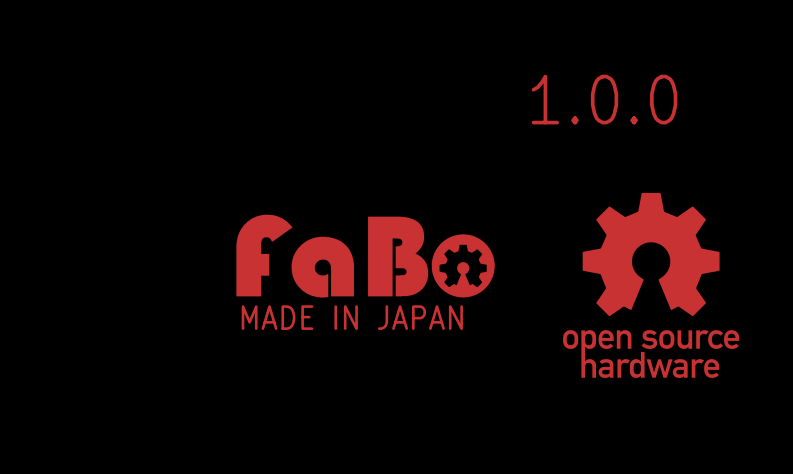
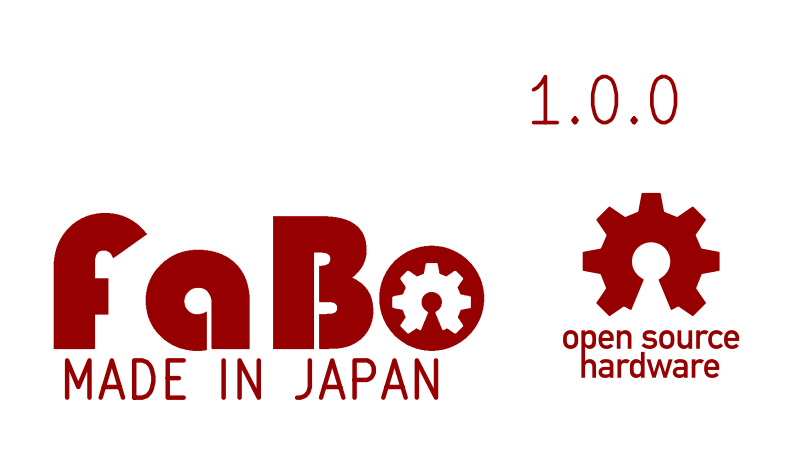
part: (365, 256) -> none
part: none -> (268, 281)

